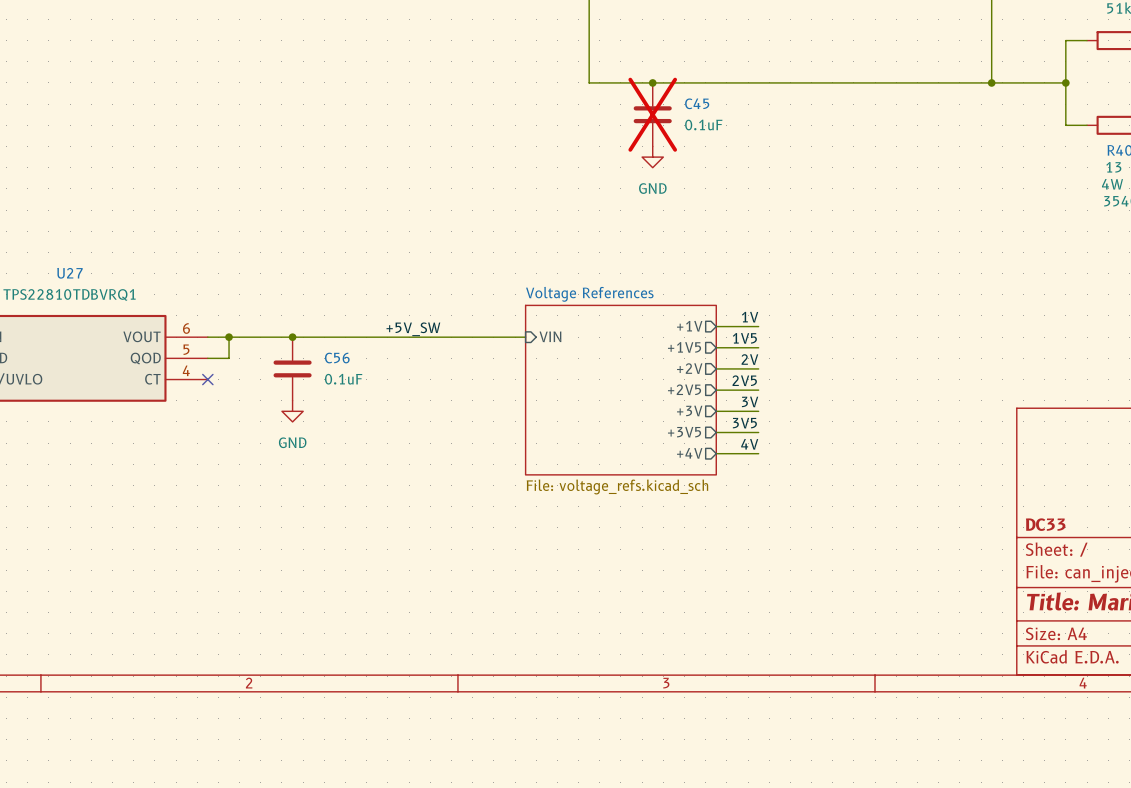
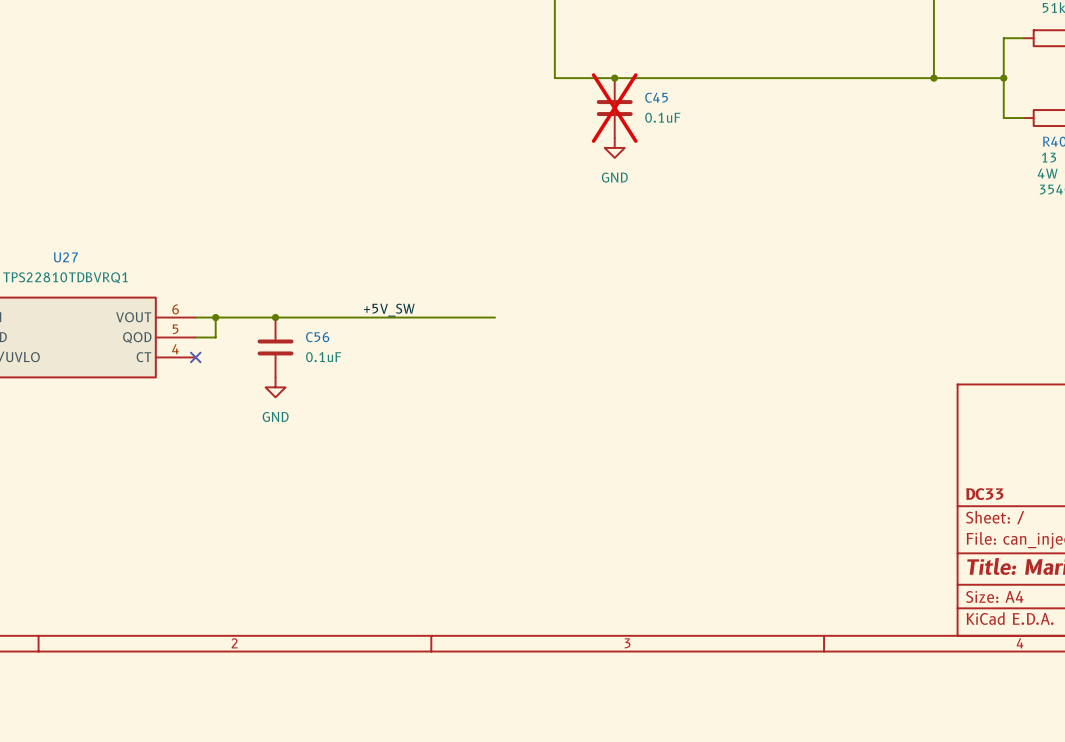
label: 1V (750, 317) -> none
sheet pin: +1V (689, 326) -> none
wire: (716, 326) (758, 326) -> none
sheet pin: VIN (550, 336) -> none
label: 1V5 (744, 338) -> none
sheet pin: +1V5 (684, 347) -> none
wire: (716, 347) (758, 347) -> none
label: 2V (749, 359) -> none
sheet pin: +2V (689, 368) -> none
wire: (716, 368) (758, 368) -> none
label: 2V5 (744, 380) -> none
sheet pin: +2V5 (684, 389) -> none
sheet Voltage References: File: voltage_refs.kicad_sch (620, 390) -> none
wire: (716, 390) (758, 390) -> none
label: 3V (750, 401) -> none
sheet pin: +3V (689, 410) -> none
wire: (716, 411) (758, 411) -> none
label: 3V5 (744, 423) -> none
sheet pin: +3V5 (684, 432) -> none
wire: (716, 432) (758, 432) -> none
label: 4V (749, 444) -> none
sheet pin: +4V (689, 453) -> none
wire: (716, 453) (758, 453) -> none

